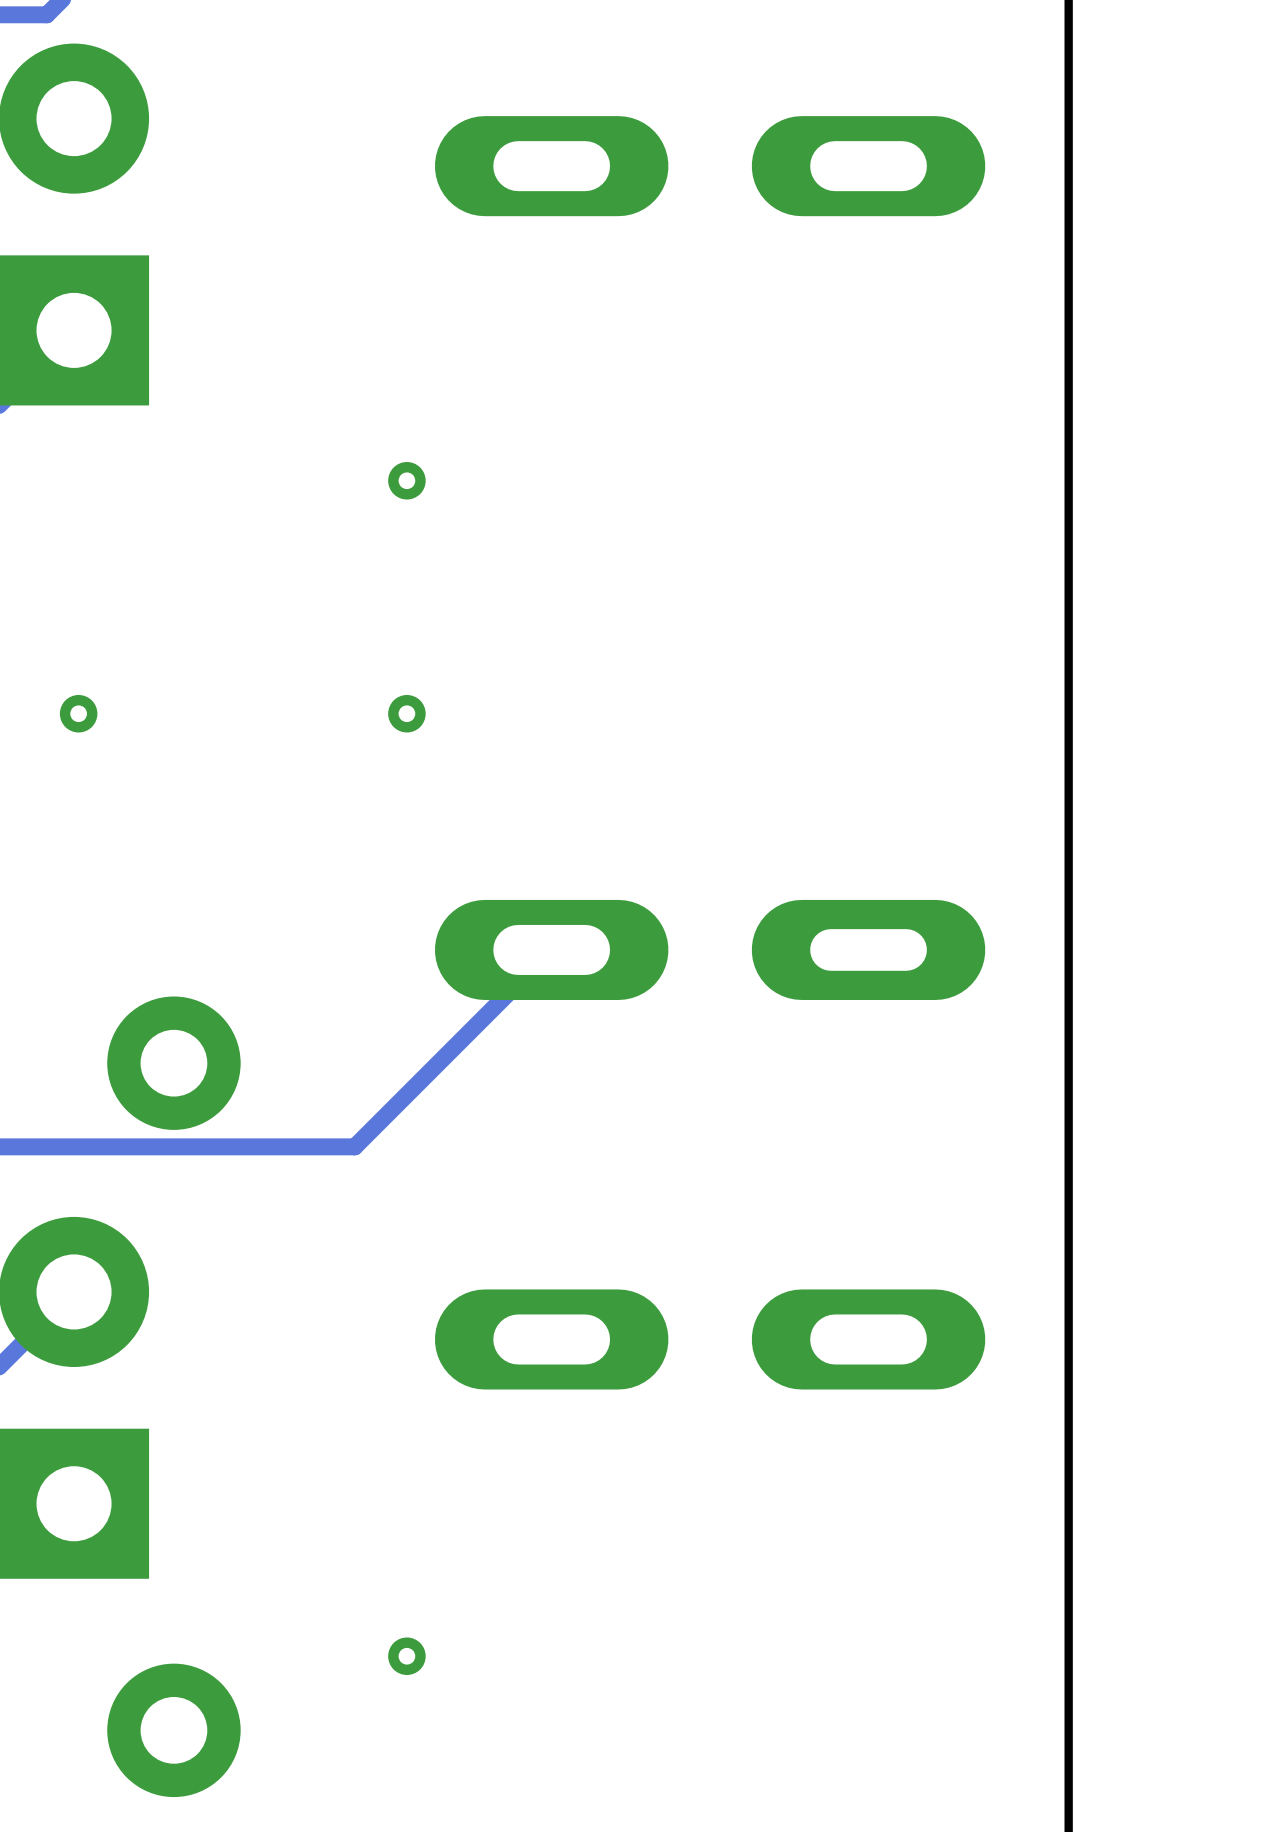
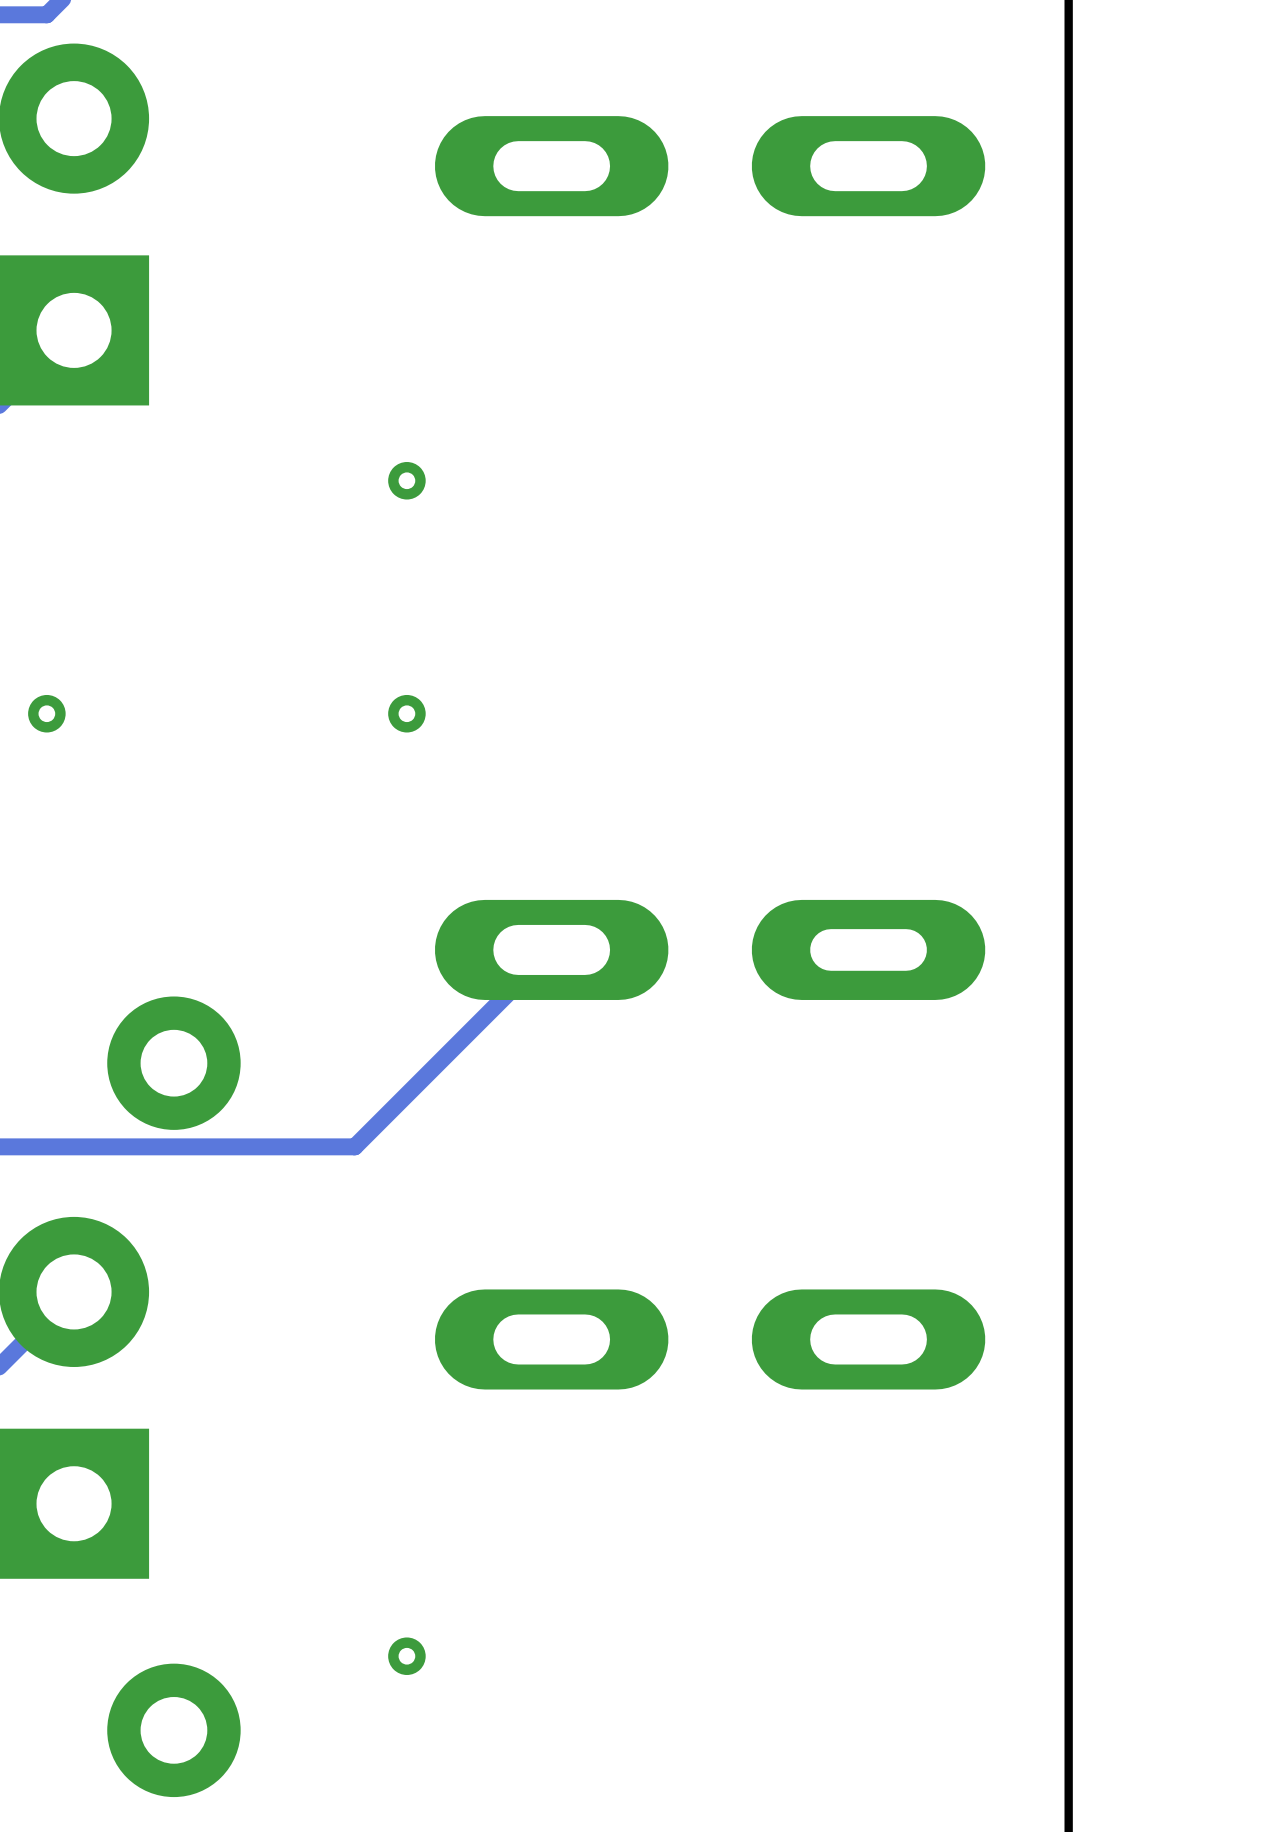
via position: (78, 713) -> (46, 713)

